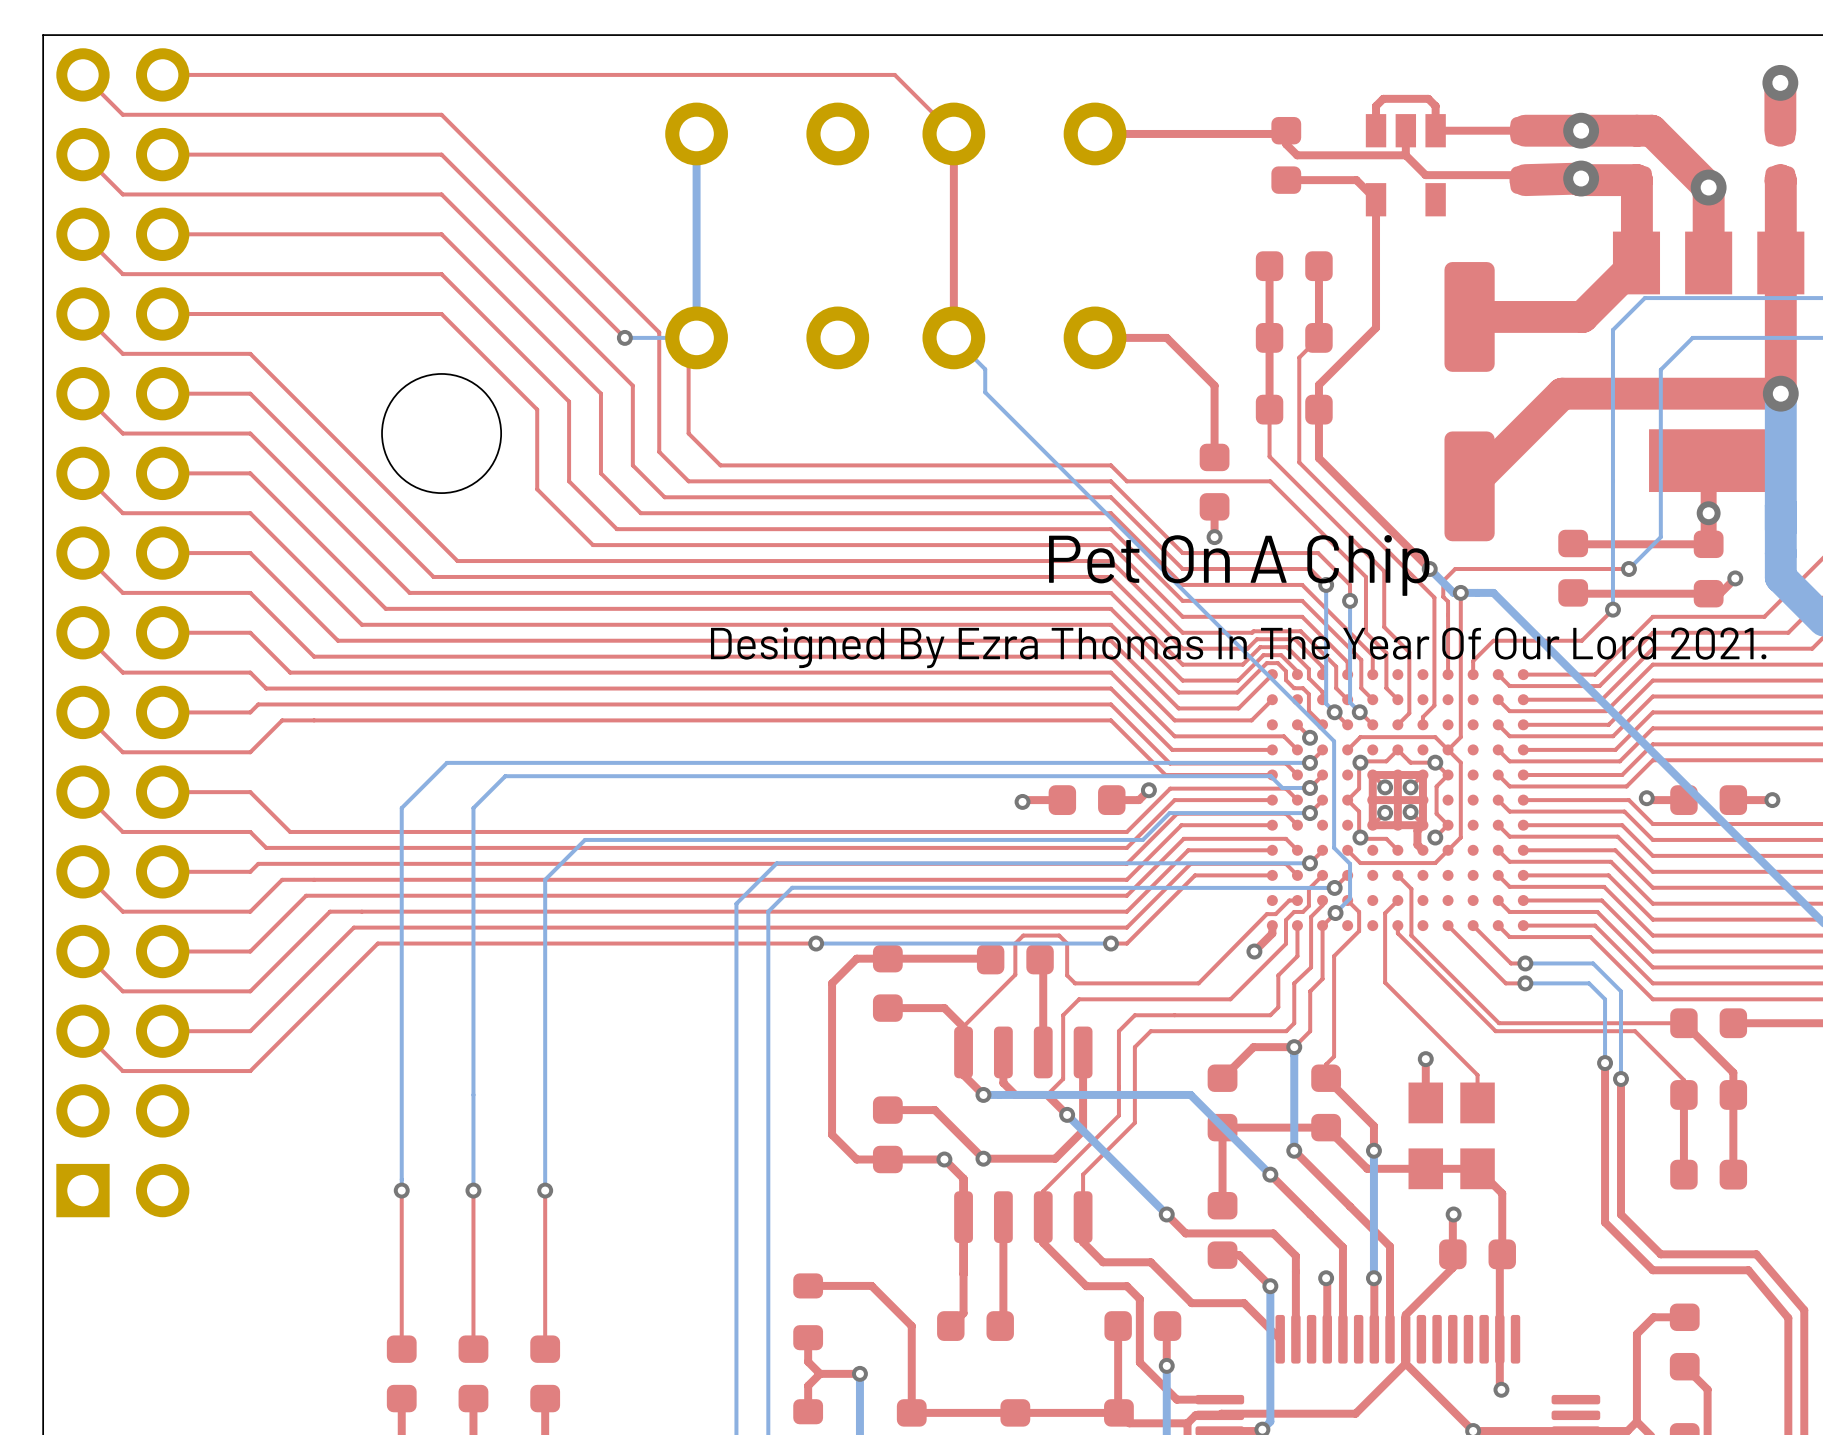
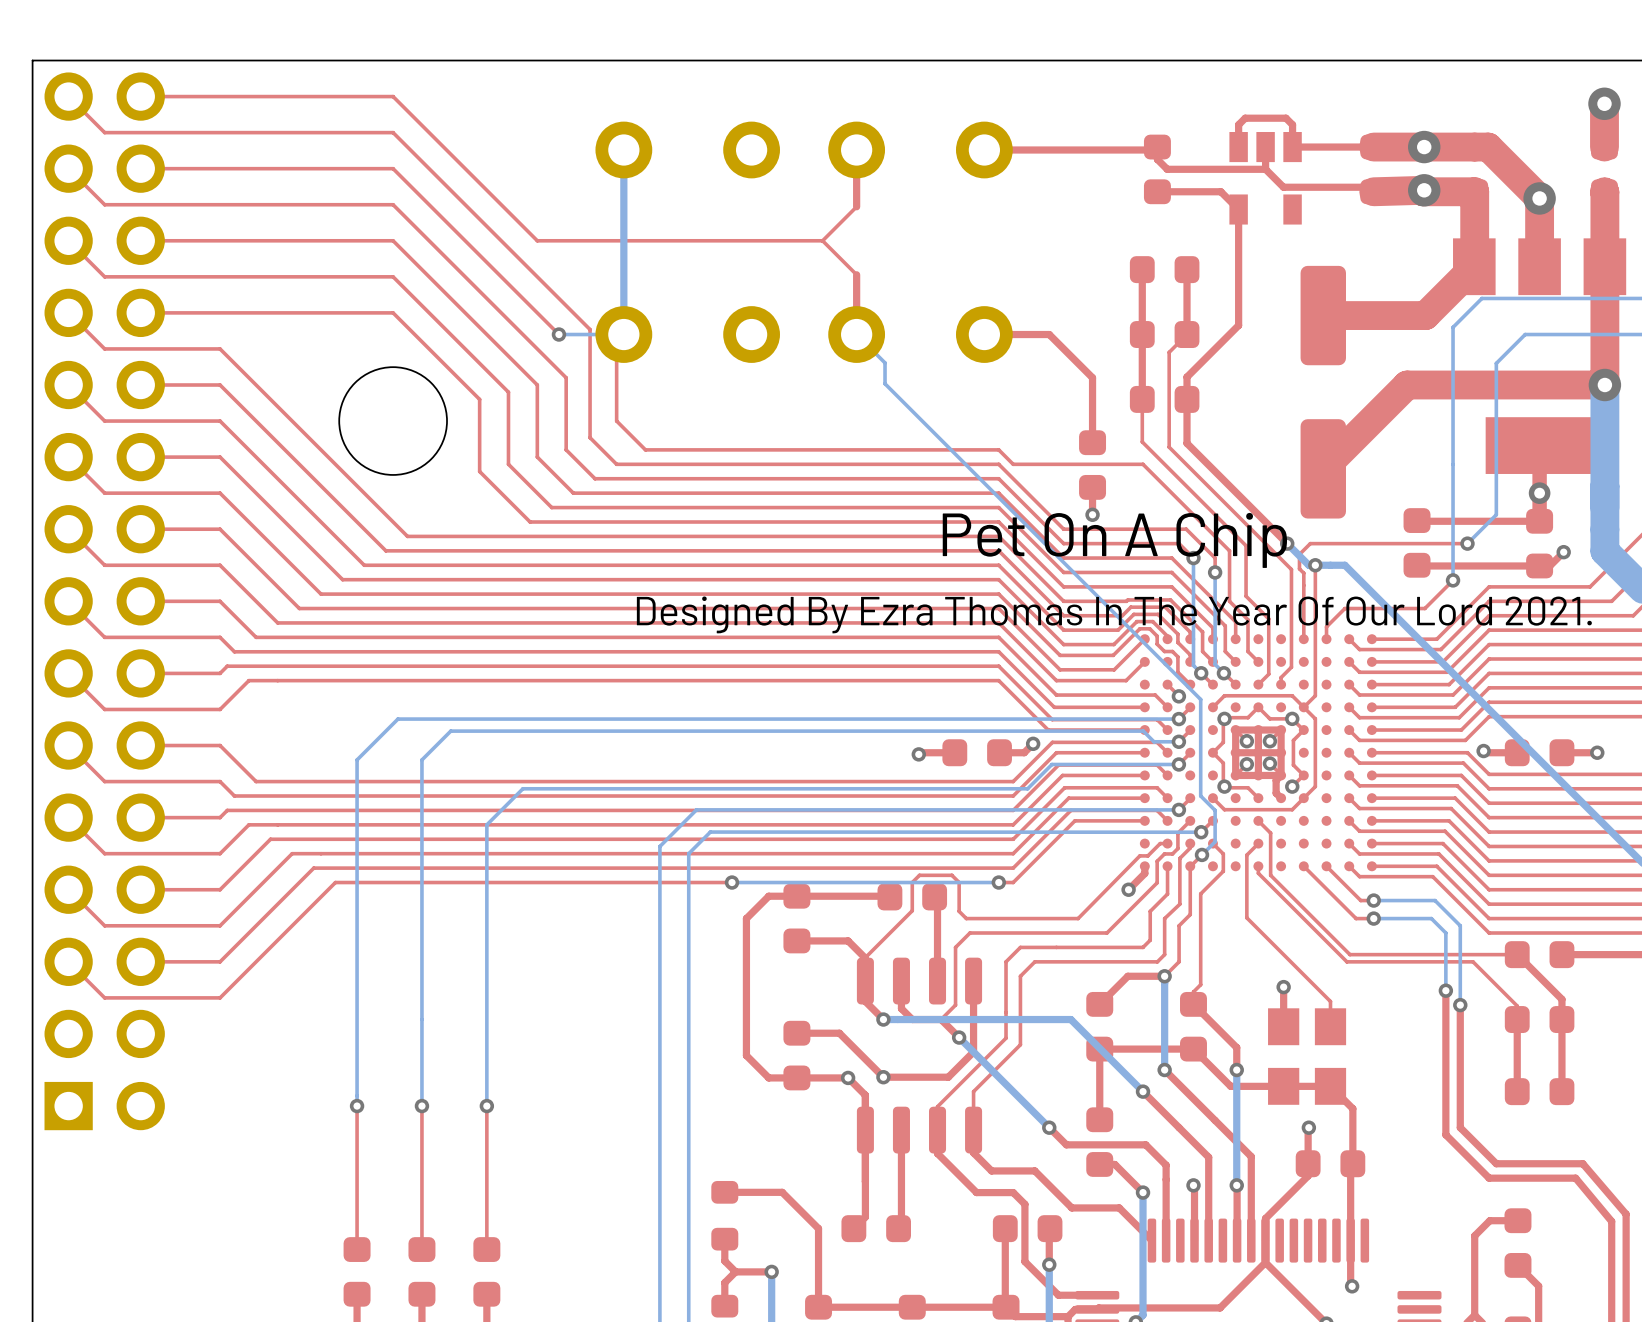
top track: (441, 74) (894, 74) (953, 133) -> (393, 96) (537, 240) (822, 240)
top track: (953, 196) (953, 271) -> (856, 206) (822, 240)
top track: none -> (822, 240) (856, 274)

